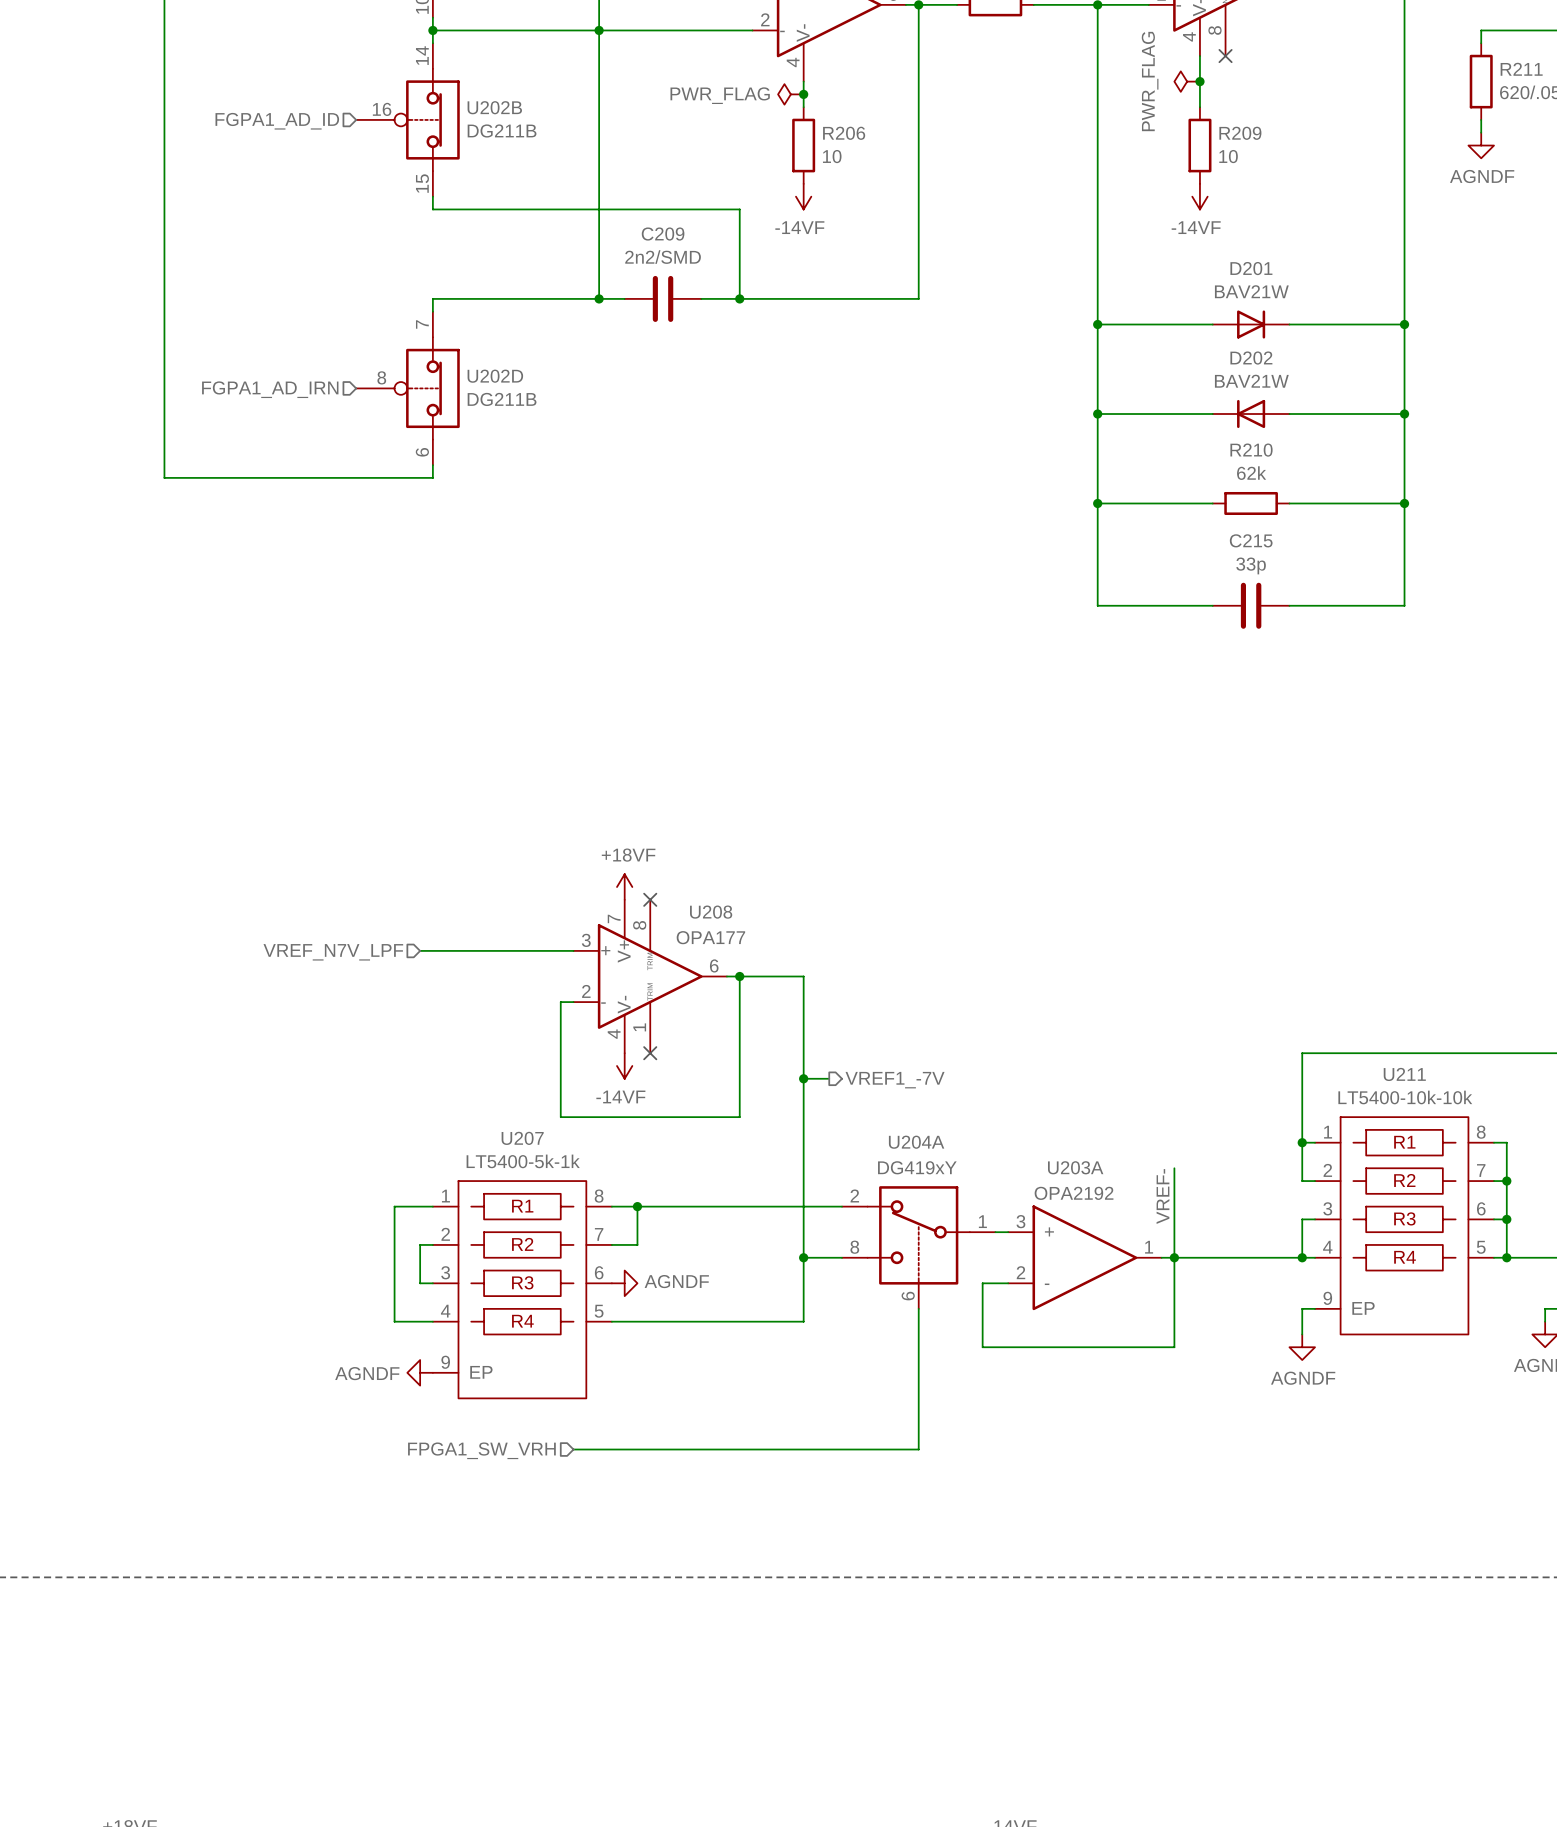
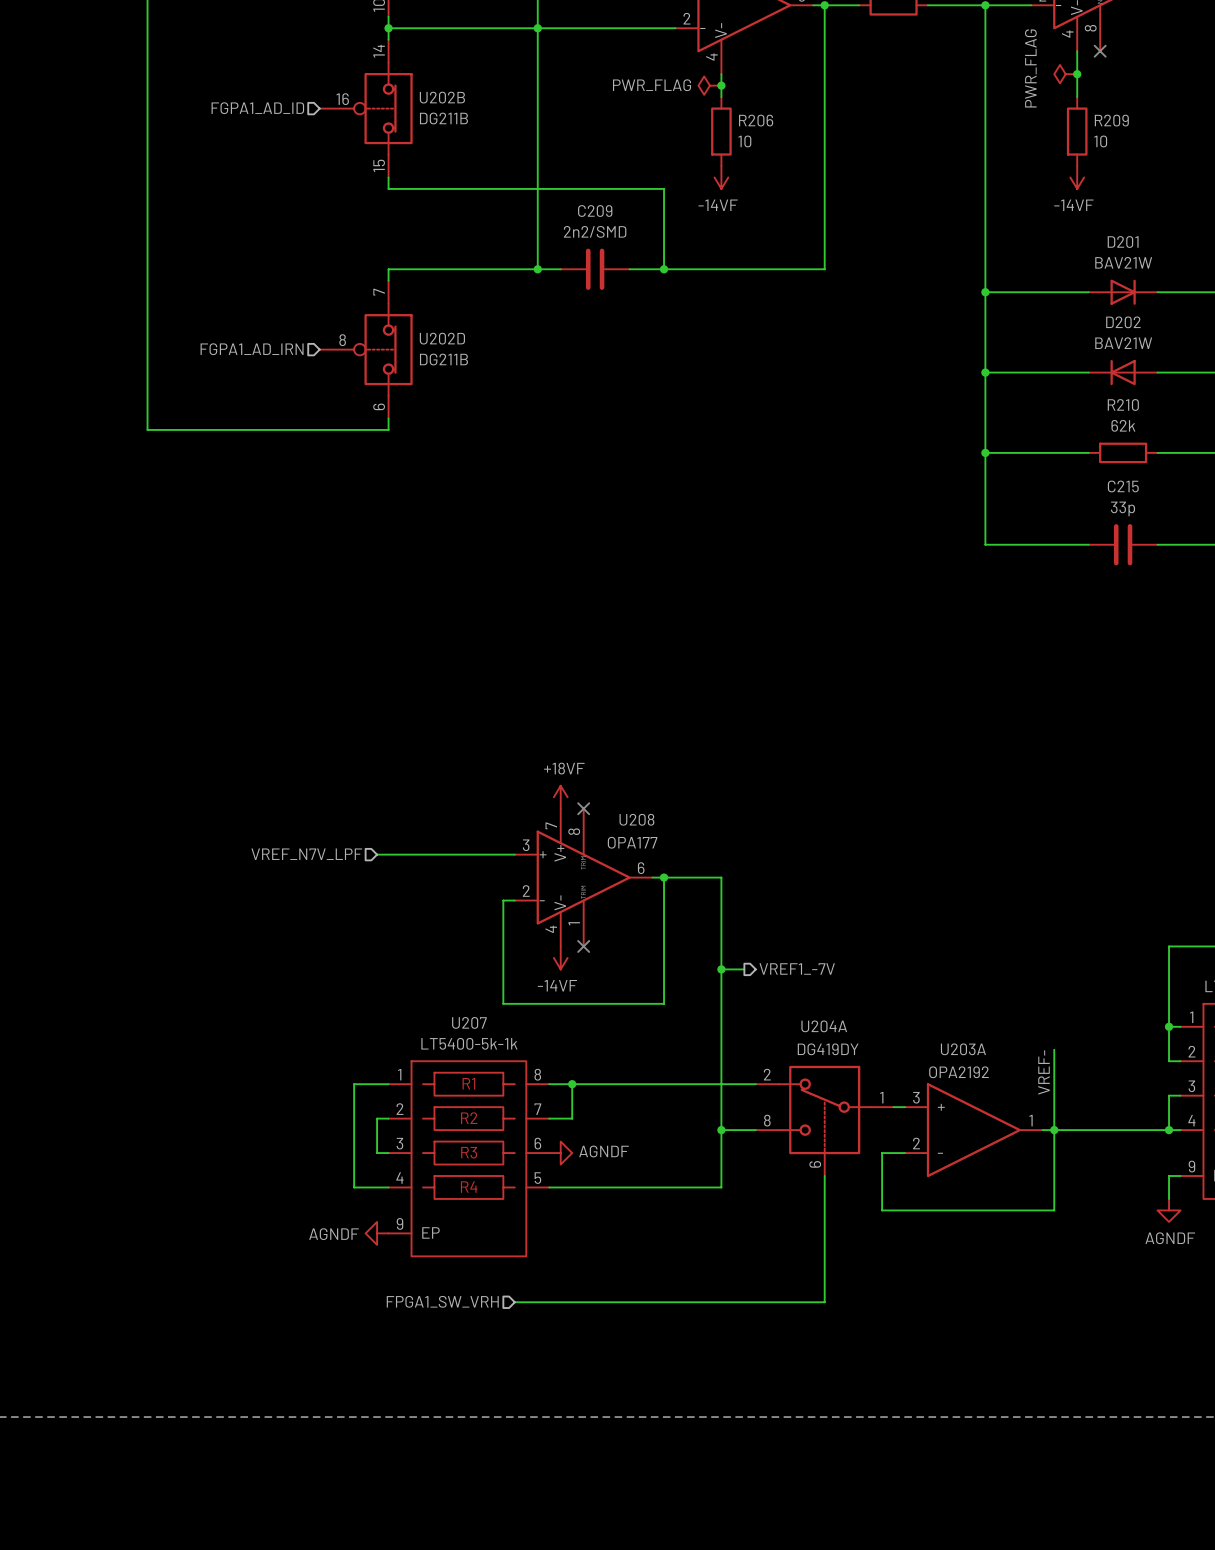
U204A value: DG419xY (917, 1167) -> DG419DY (828, 1049)

